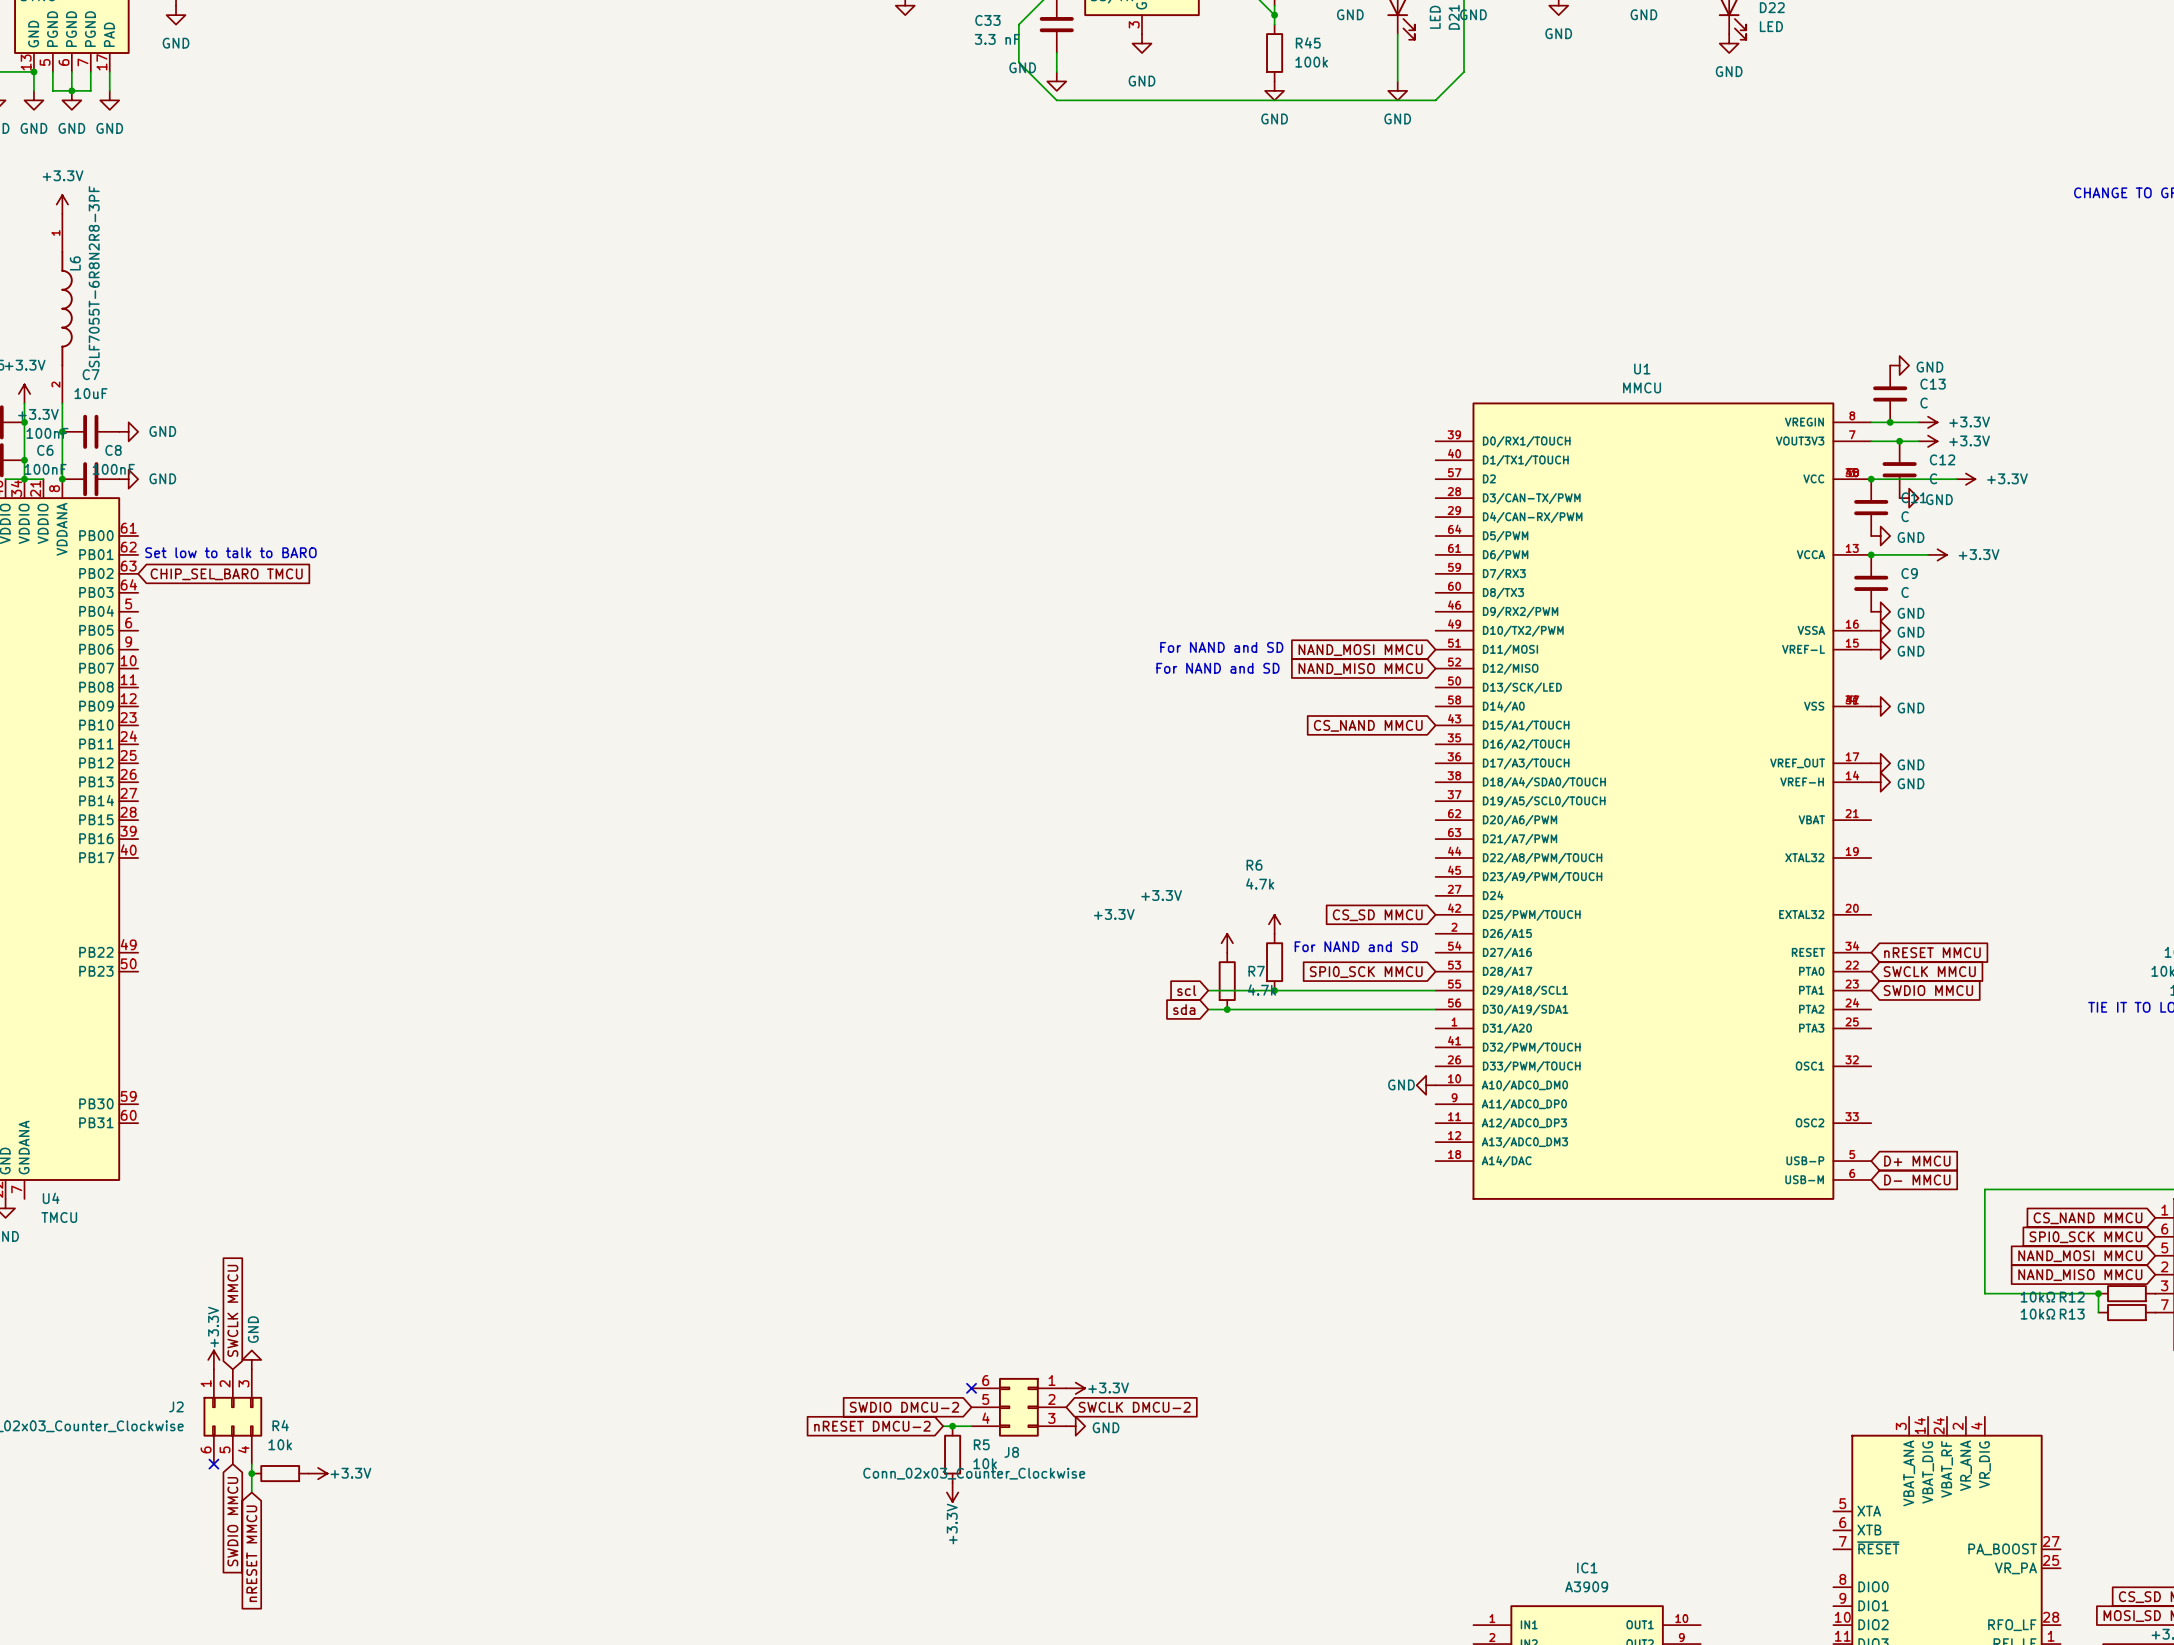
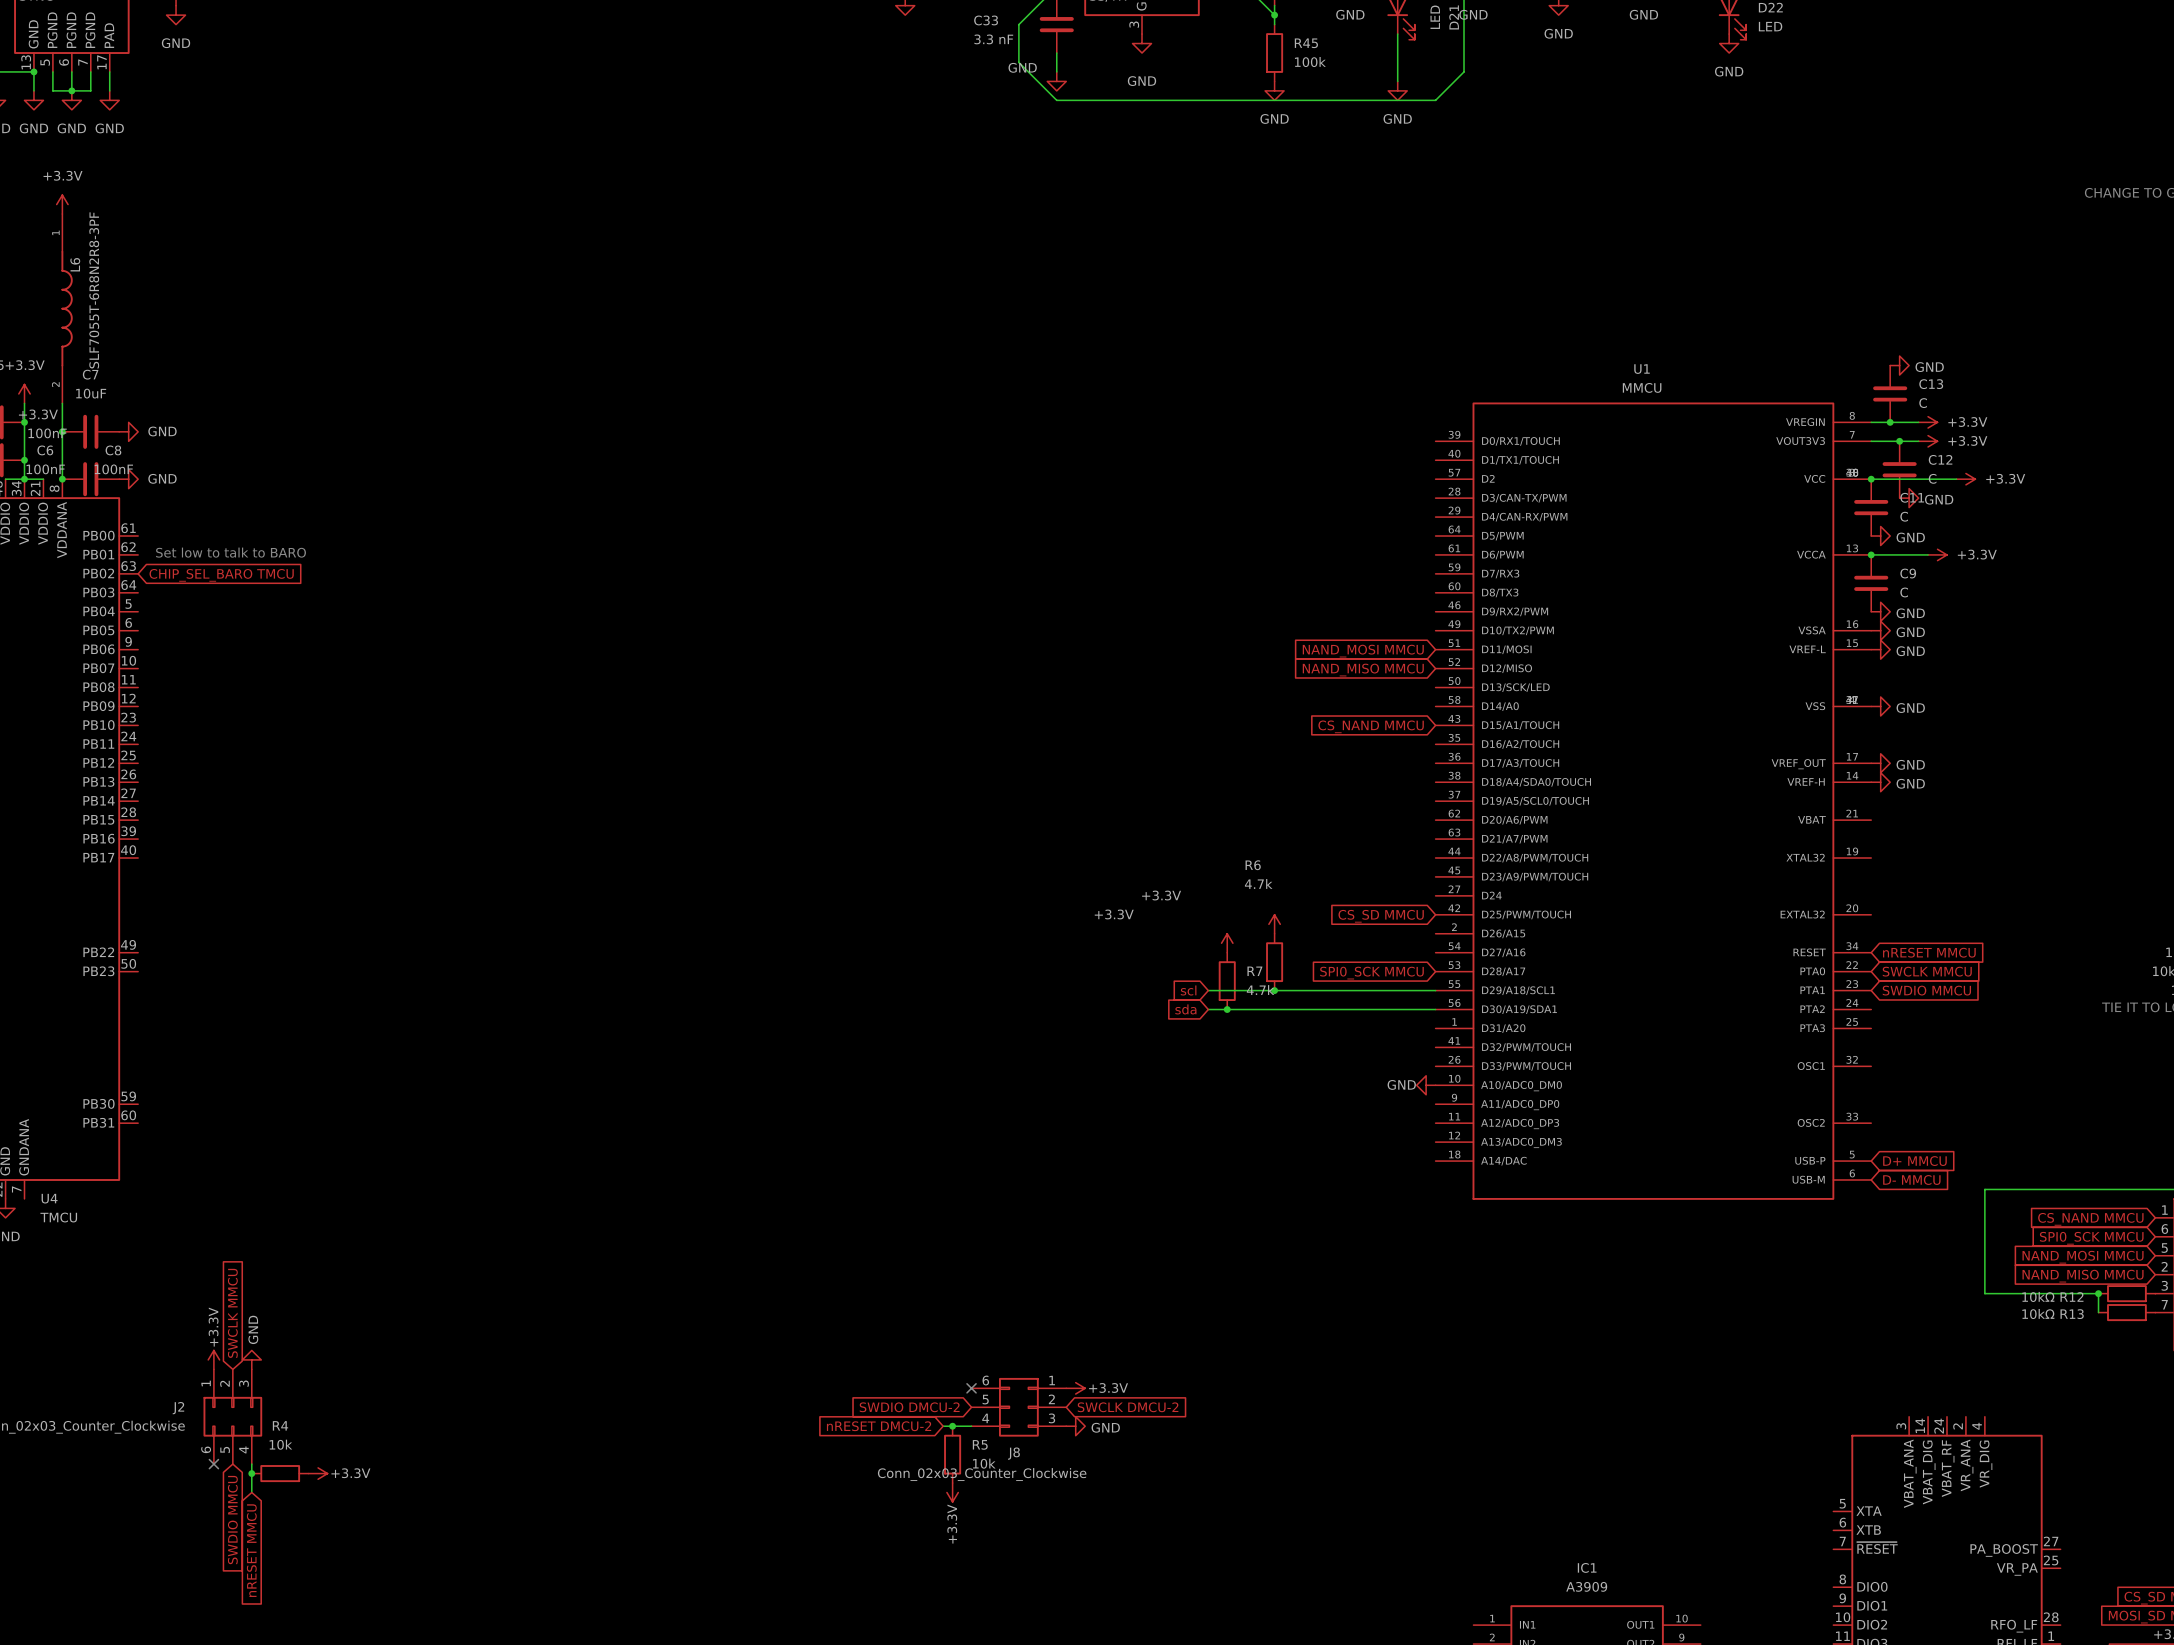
text: For NAND and SD (1221, 647) -> none
text: For NAND and SD (1217, 668) -> none
text: For NAND and SD (1356, 946) -> none

